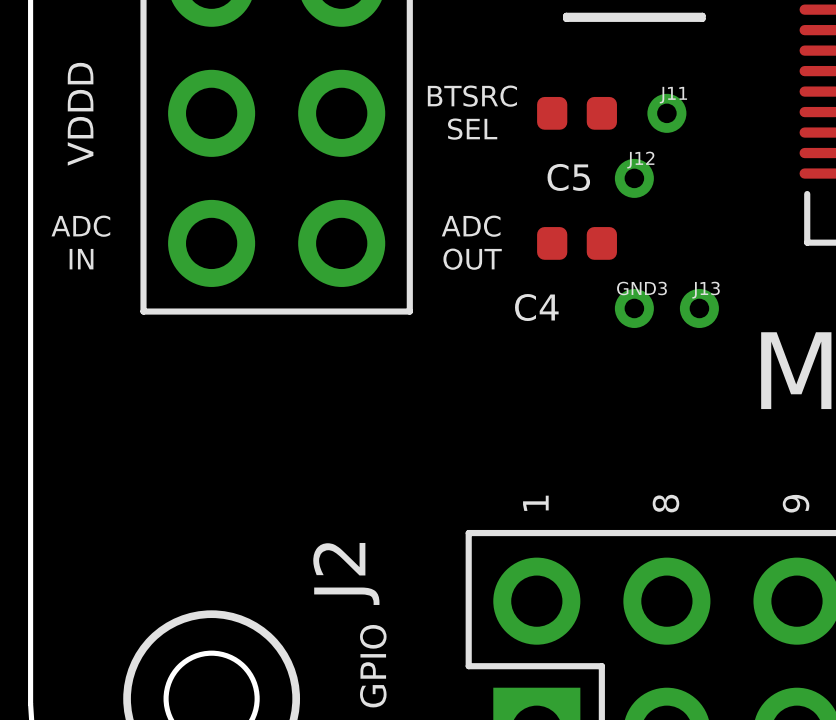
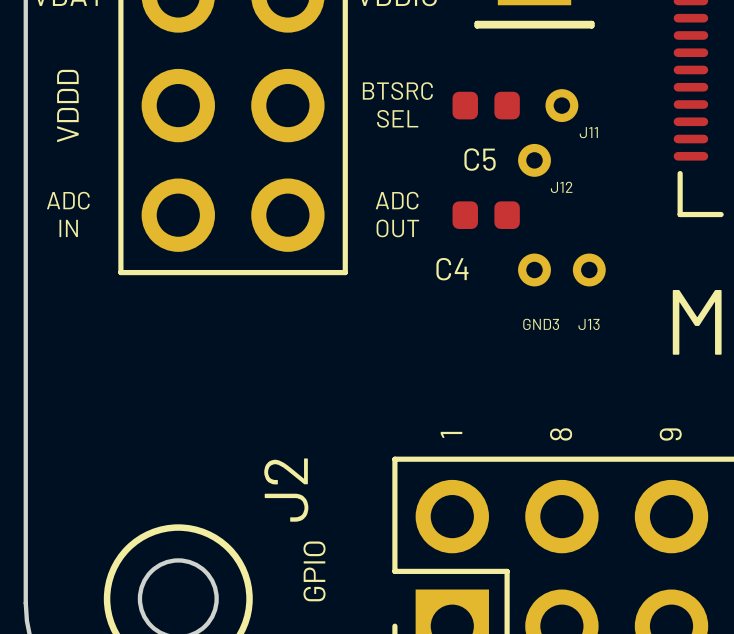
J11 name position: J11 (673, 95) -> J11 (588, 132)
J12 name position: J12 (640, 160) -> J12 (561, 187)
GND3 name position: GND3 (641, 288) -> GND3 (541, 324)
J13 name position: J13 (706, 290) -> J13 (589, 324)

